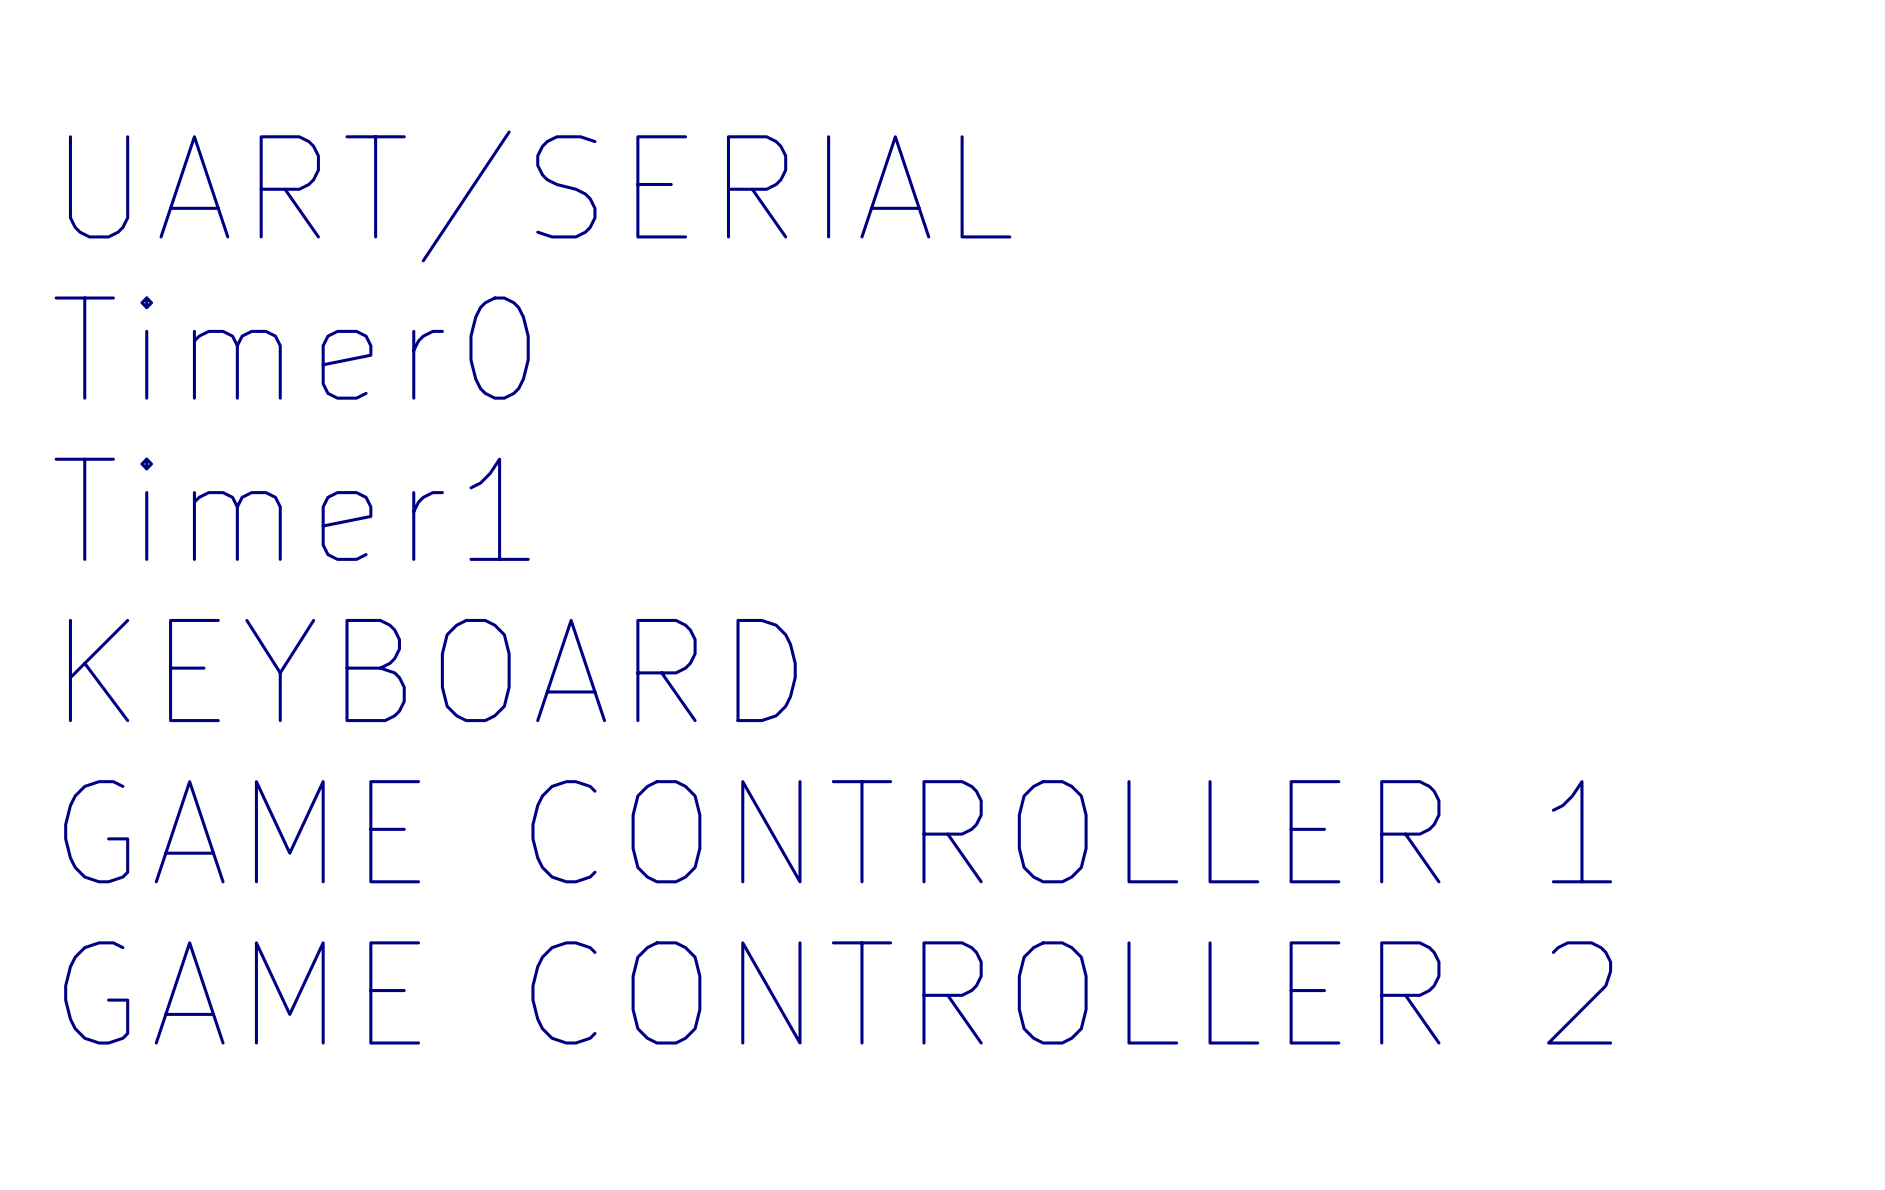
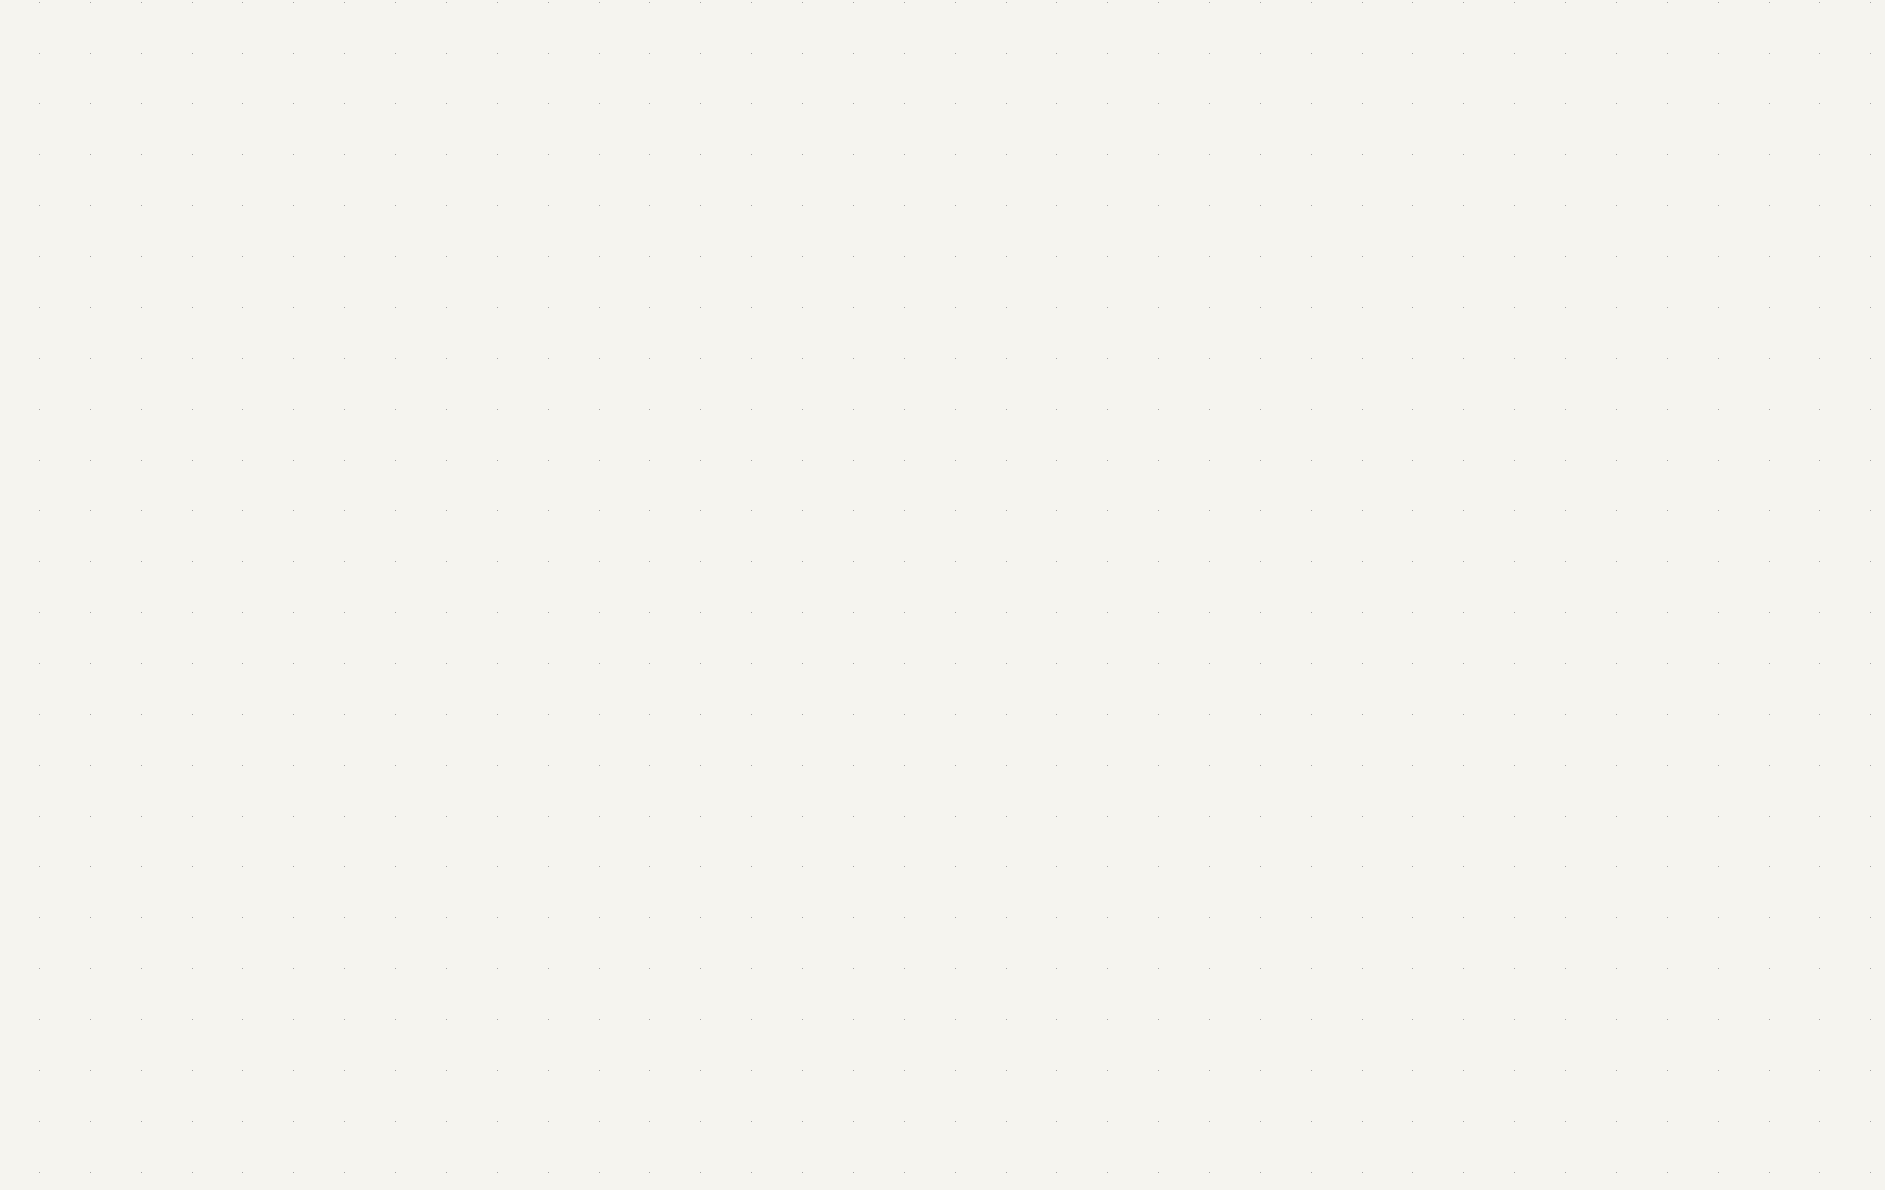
text: UART/SERIAL (540, 196) -> none
text: Timer0 (292, 348) -> none
text: Timer1 (292, 509) -> none
text: KEYBOARD (432, 670) -> none
text: GAME CONTROLLER 1 (838, 831) -> none
text: GAME CONTROLLER 2 (838, 992) -> none

